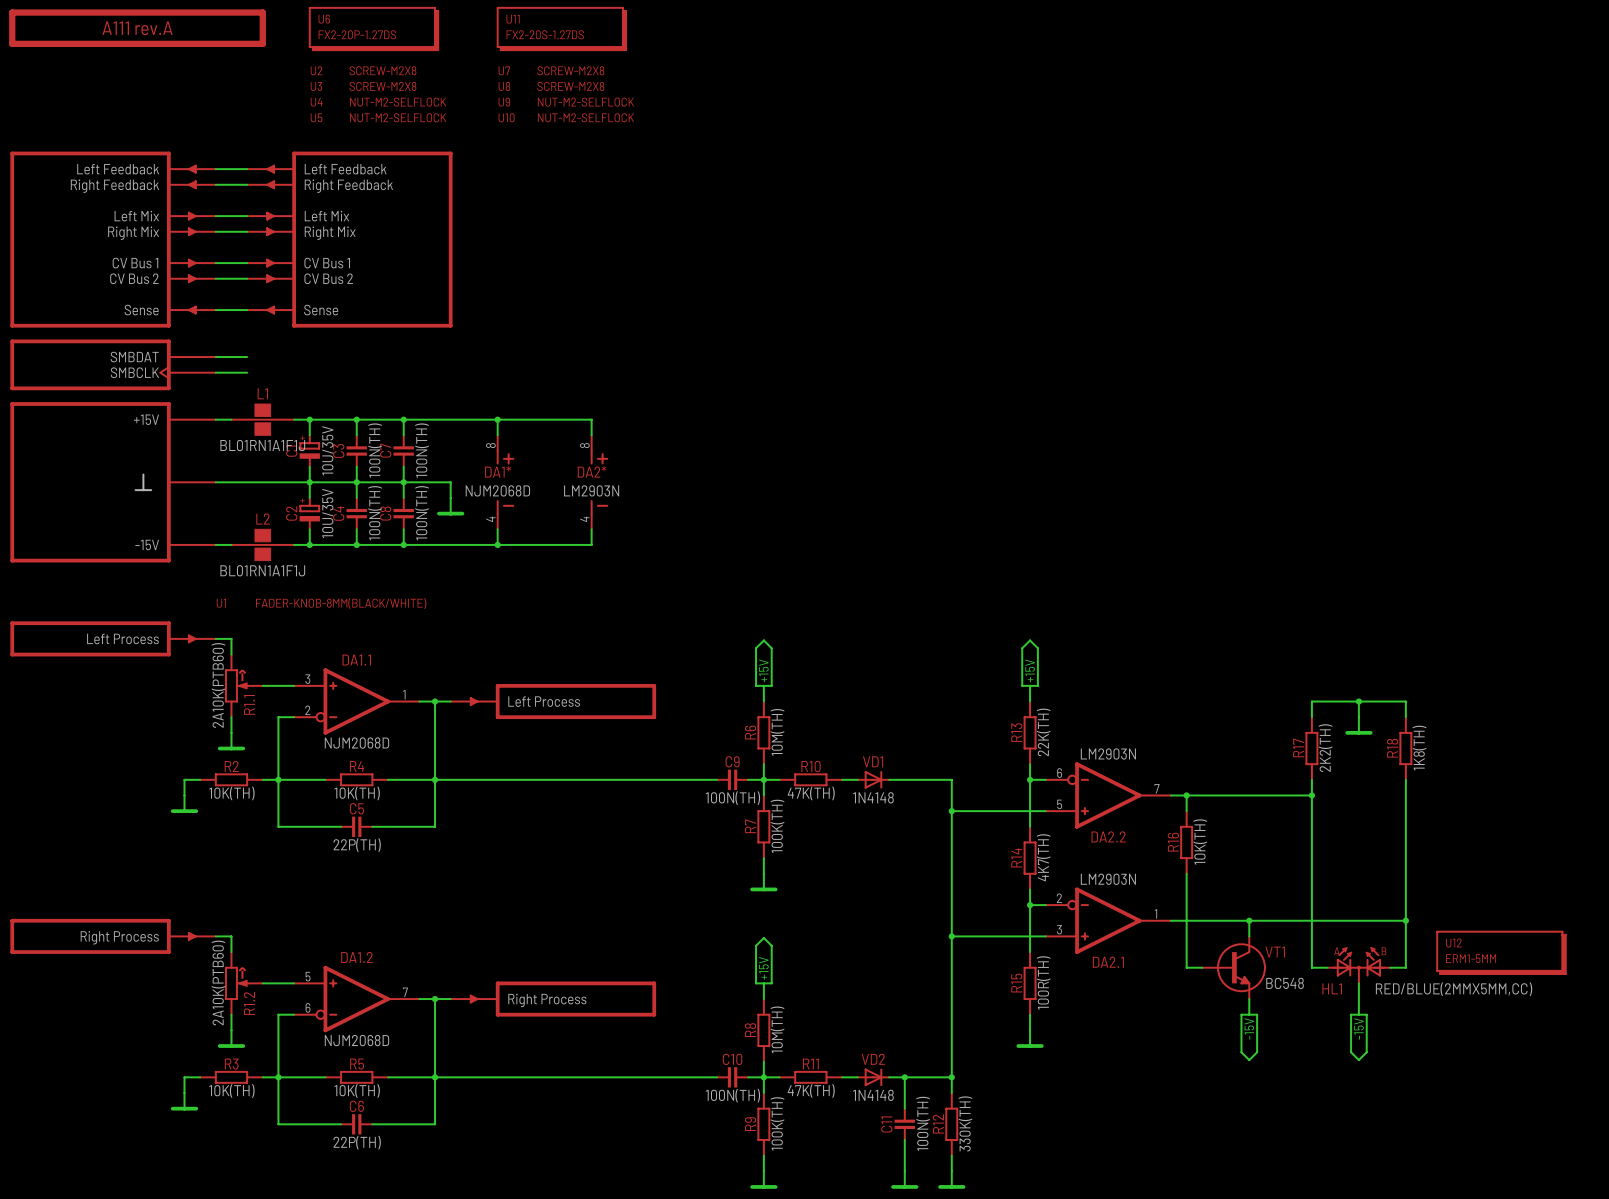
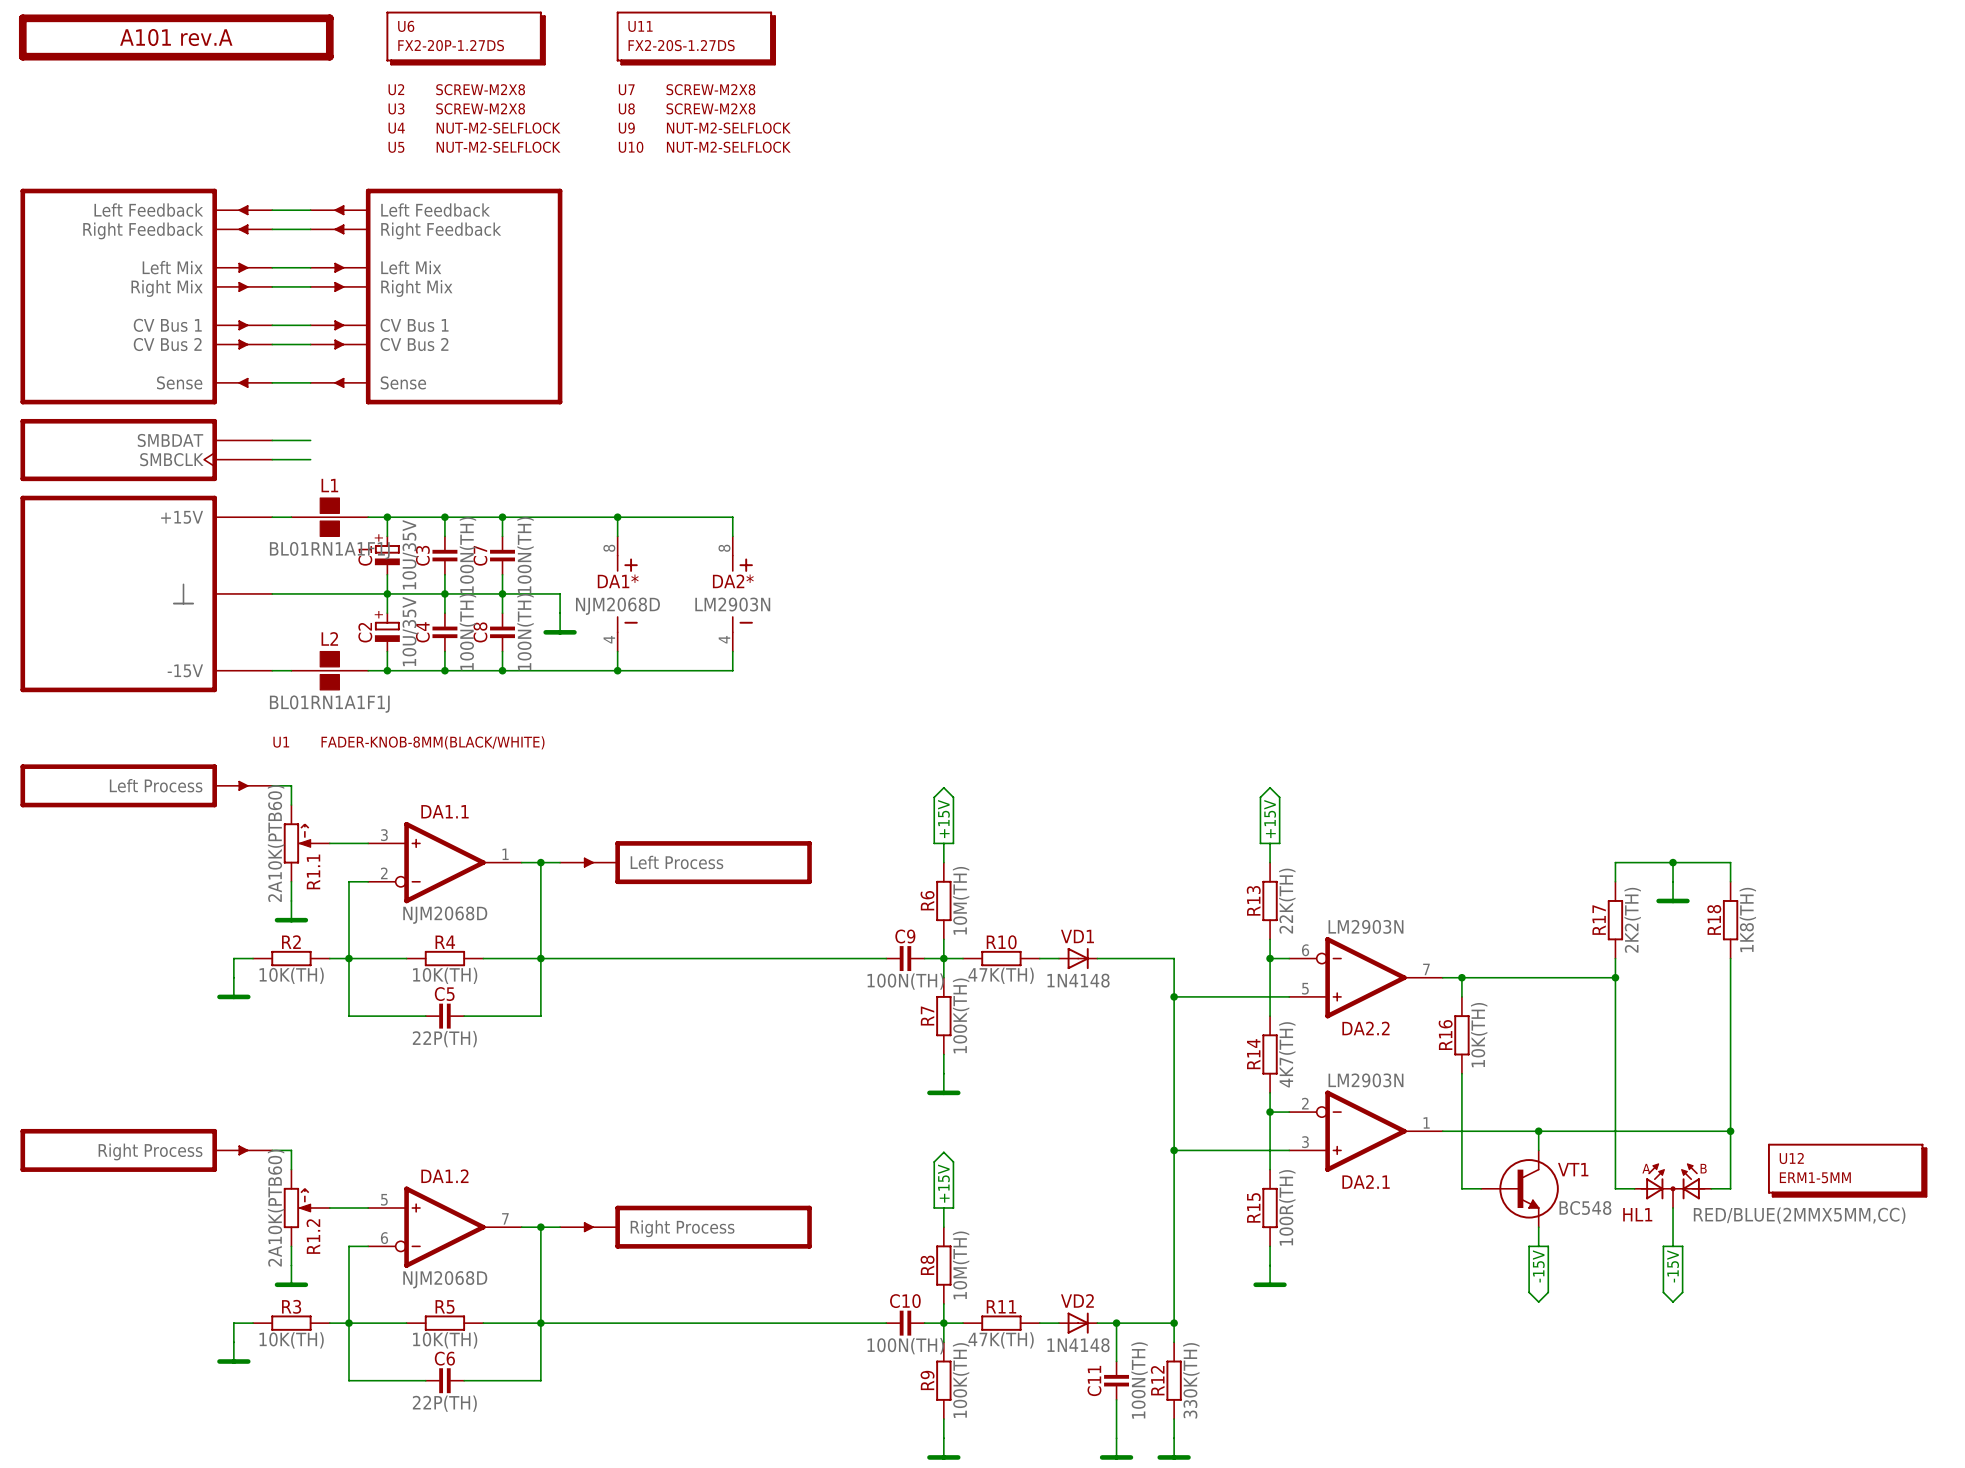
part value: A111 rev.A (137, 28) -> A101 rev.A (176, 37)

